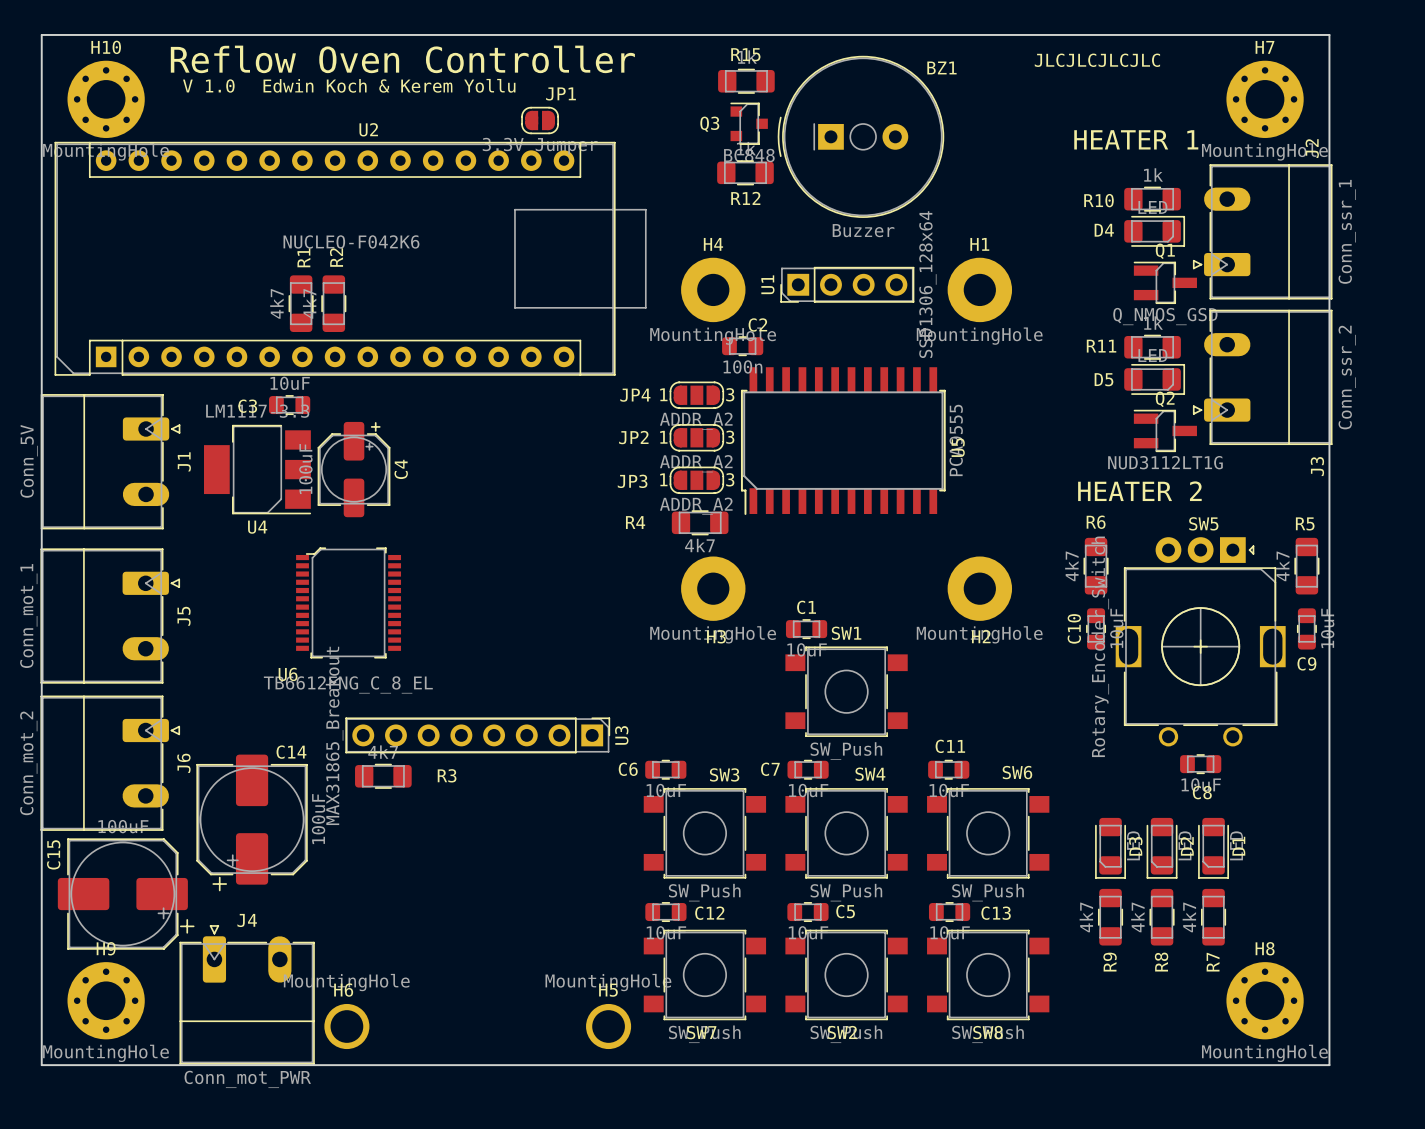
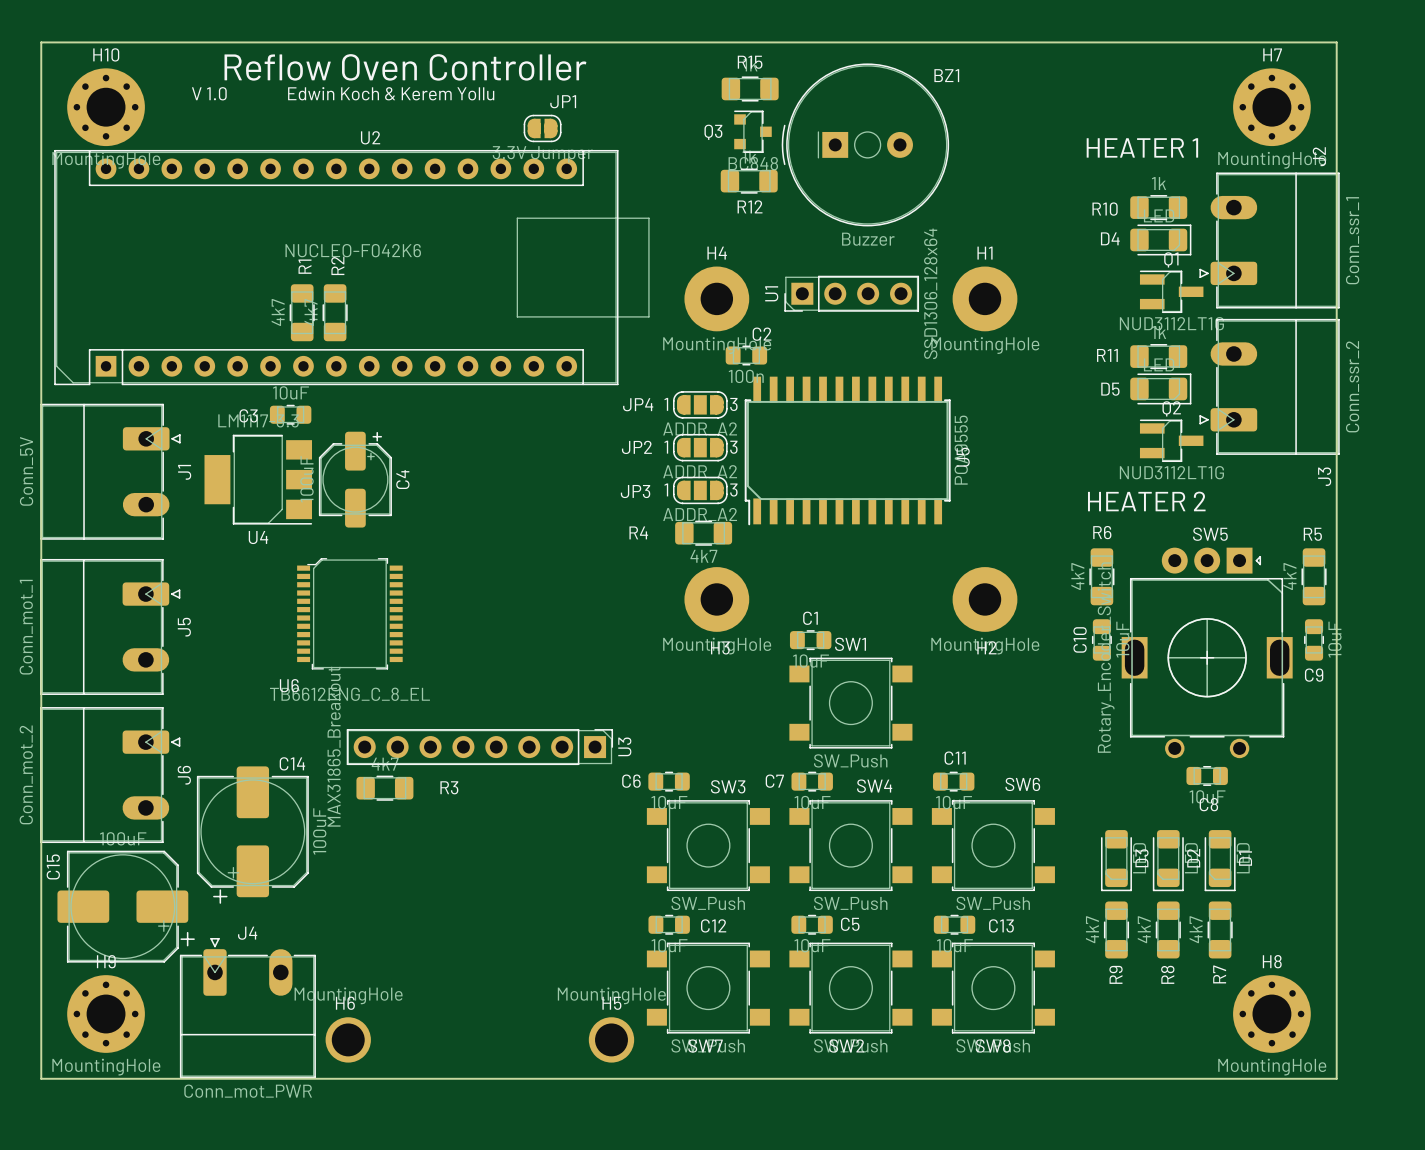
text: JLCJLCJLCJLC (1097, 60) -> none
Q1 value: Q_NMOS_GSD (1165, 316) -> NUD3112LT1G (1171, 323)

